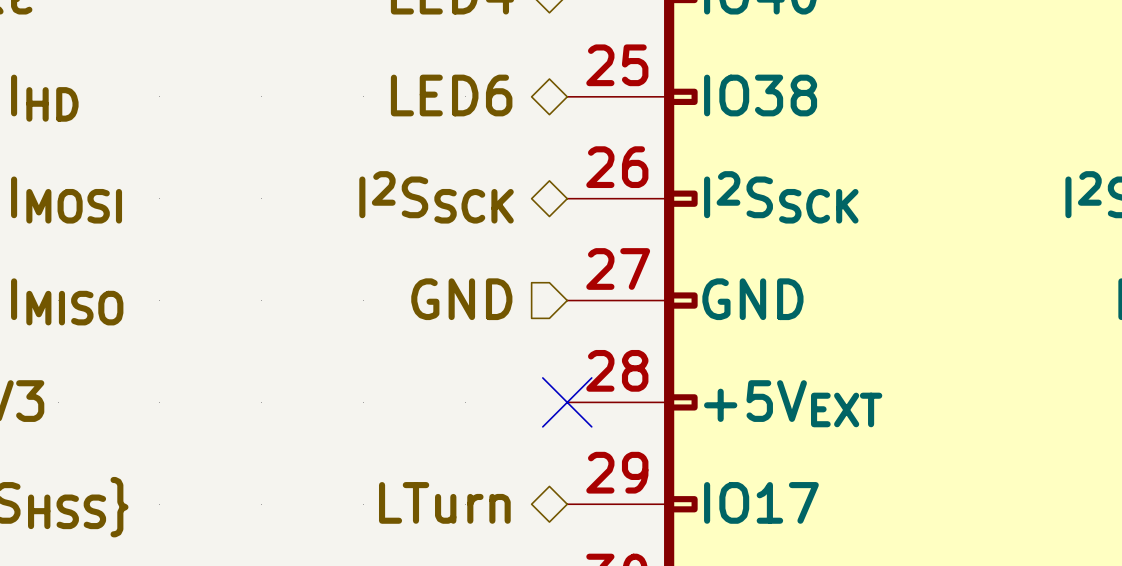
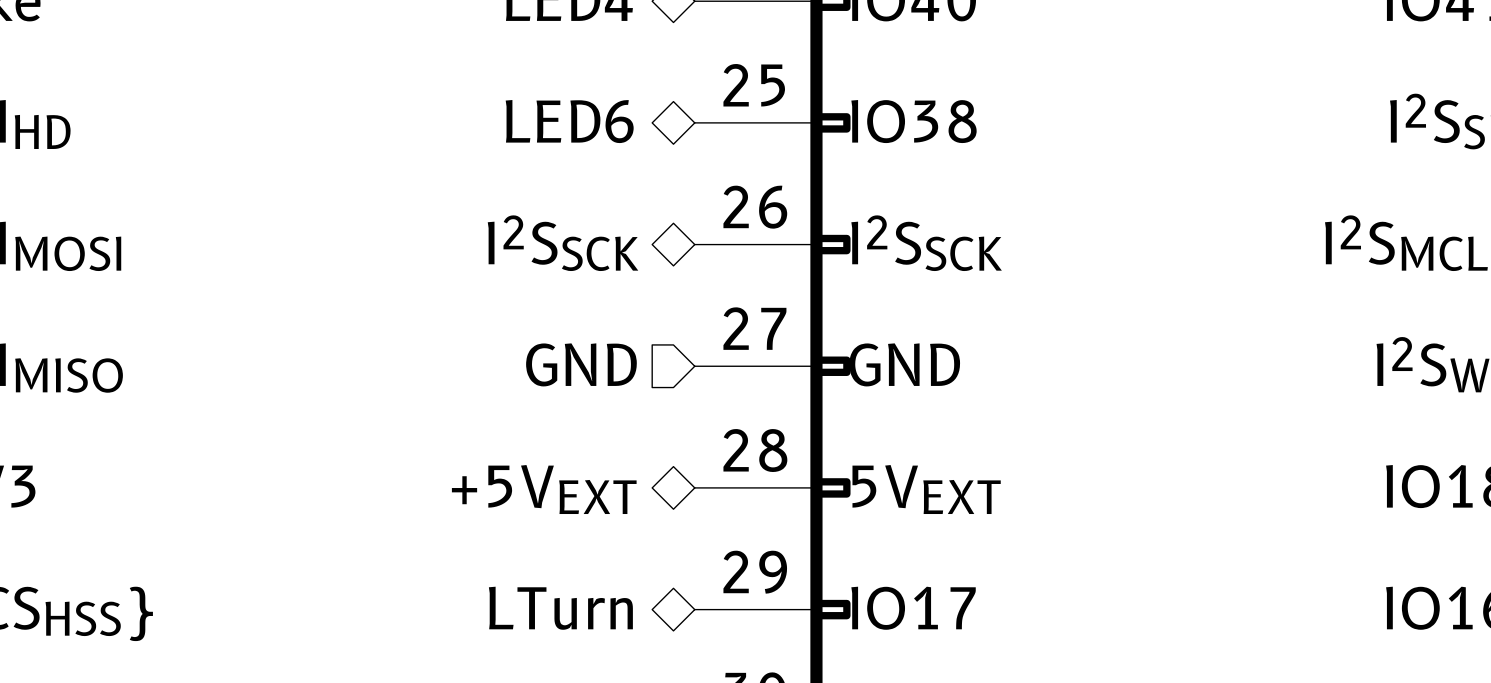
no-connect mark: (567, 402) -> none
hierarchical label: none -> +5VEXT (544, 489)
part pin name: +5VEXT (793, 403) -> 5VEXT (926, 489)

